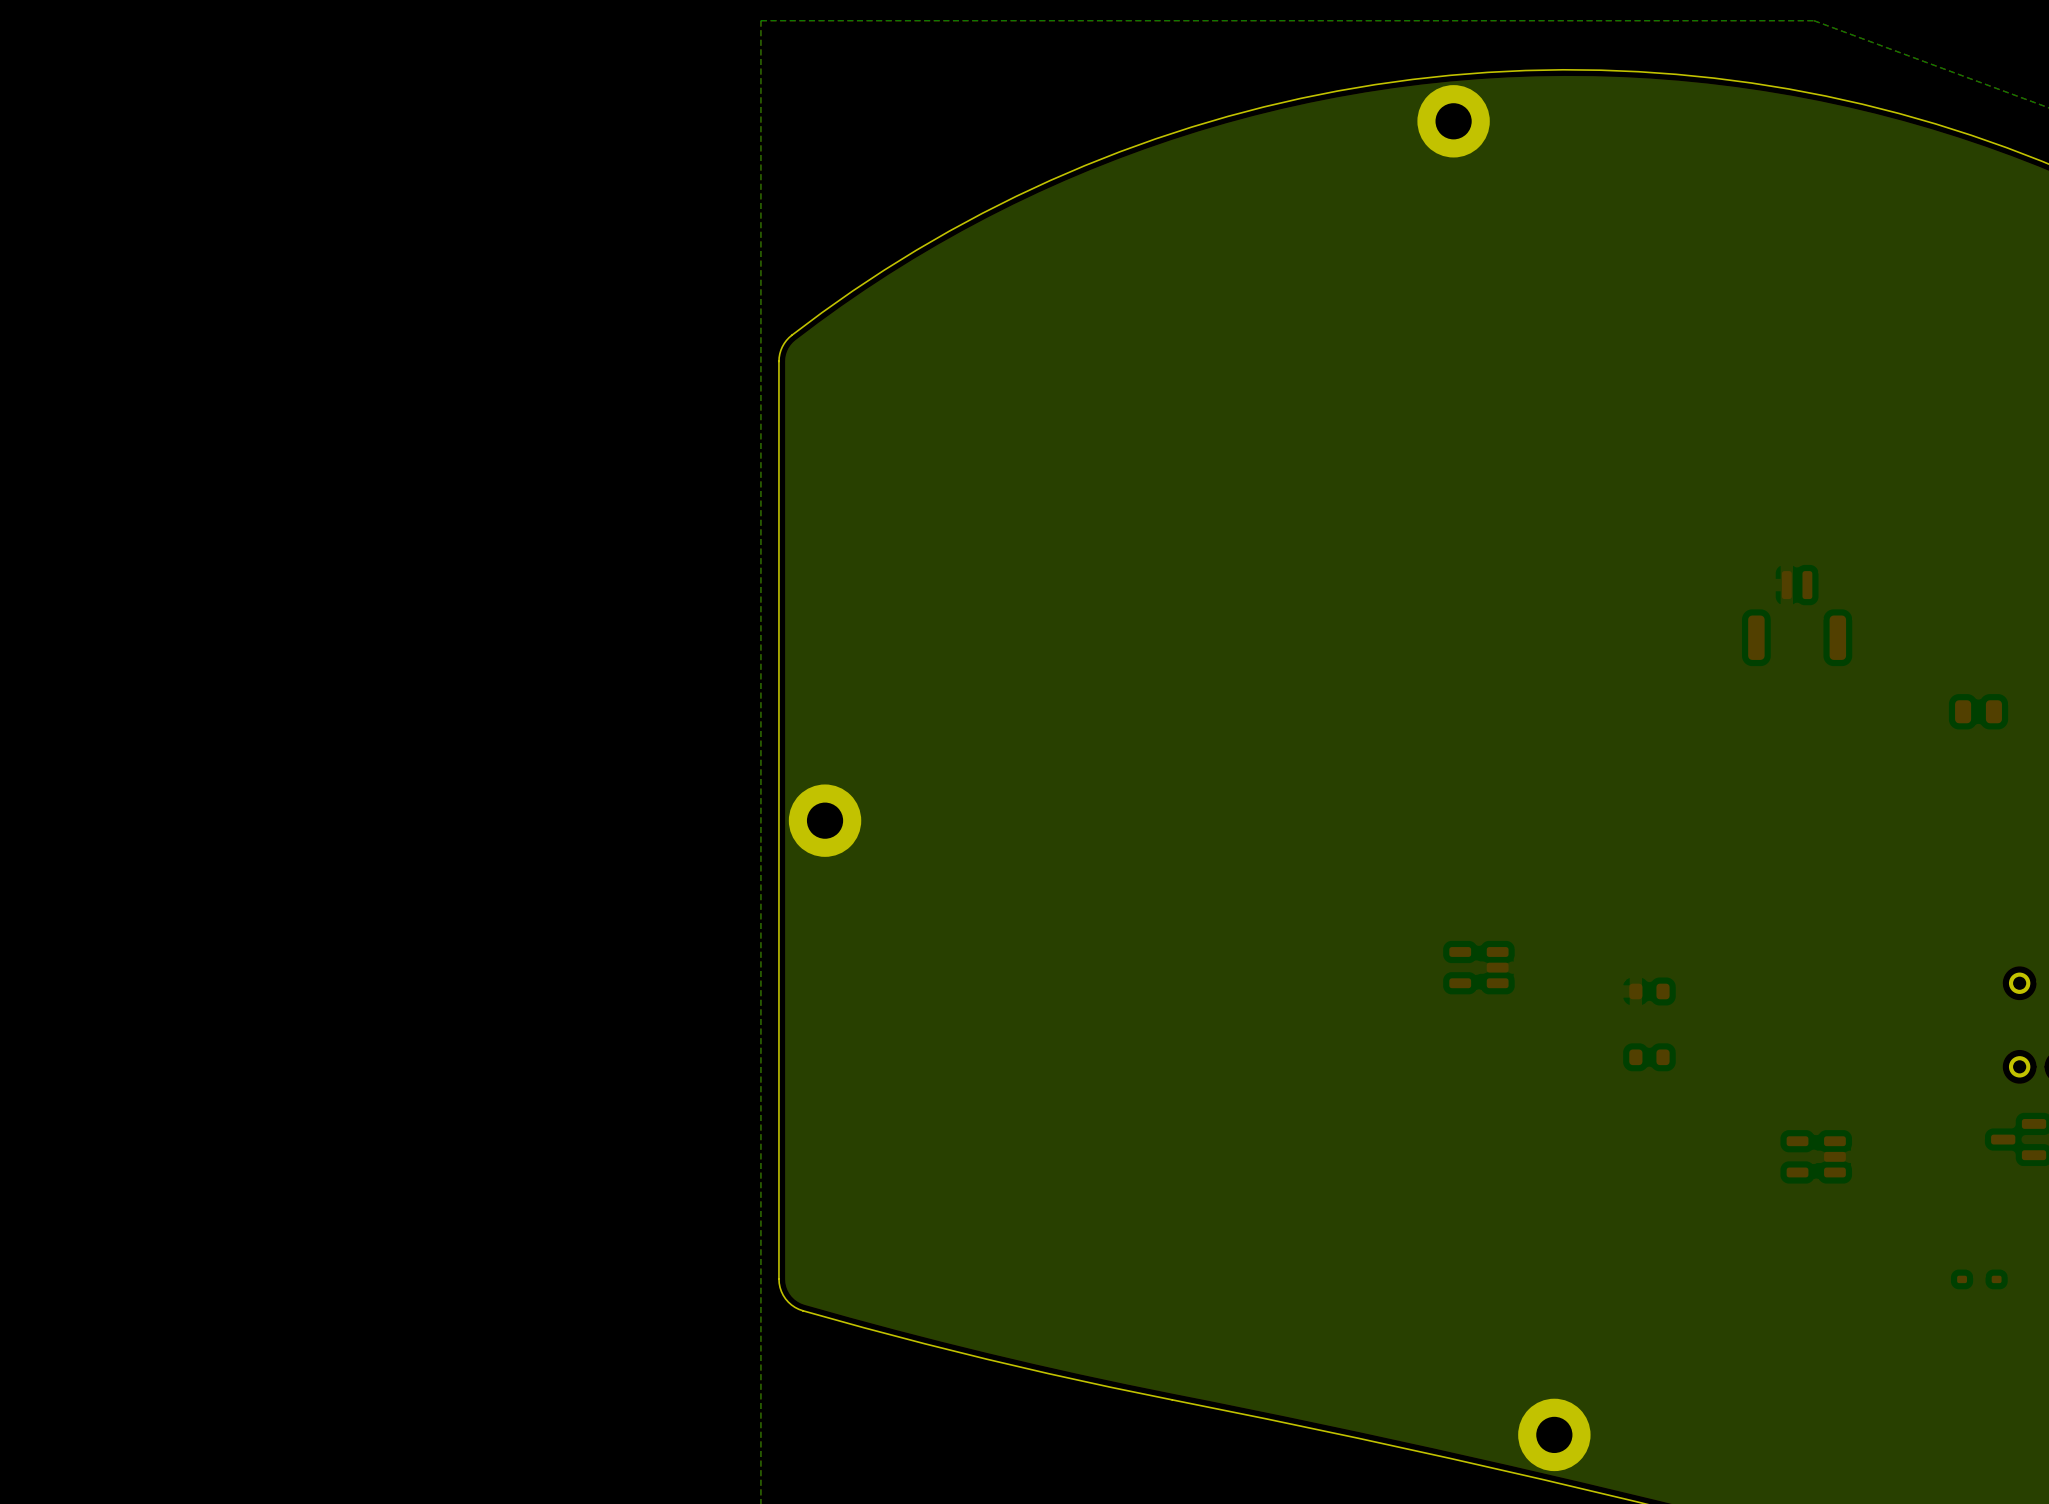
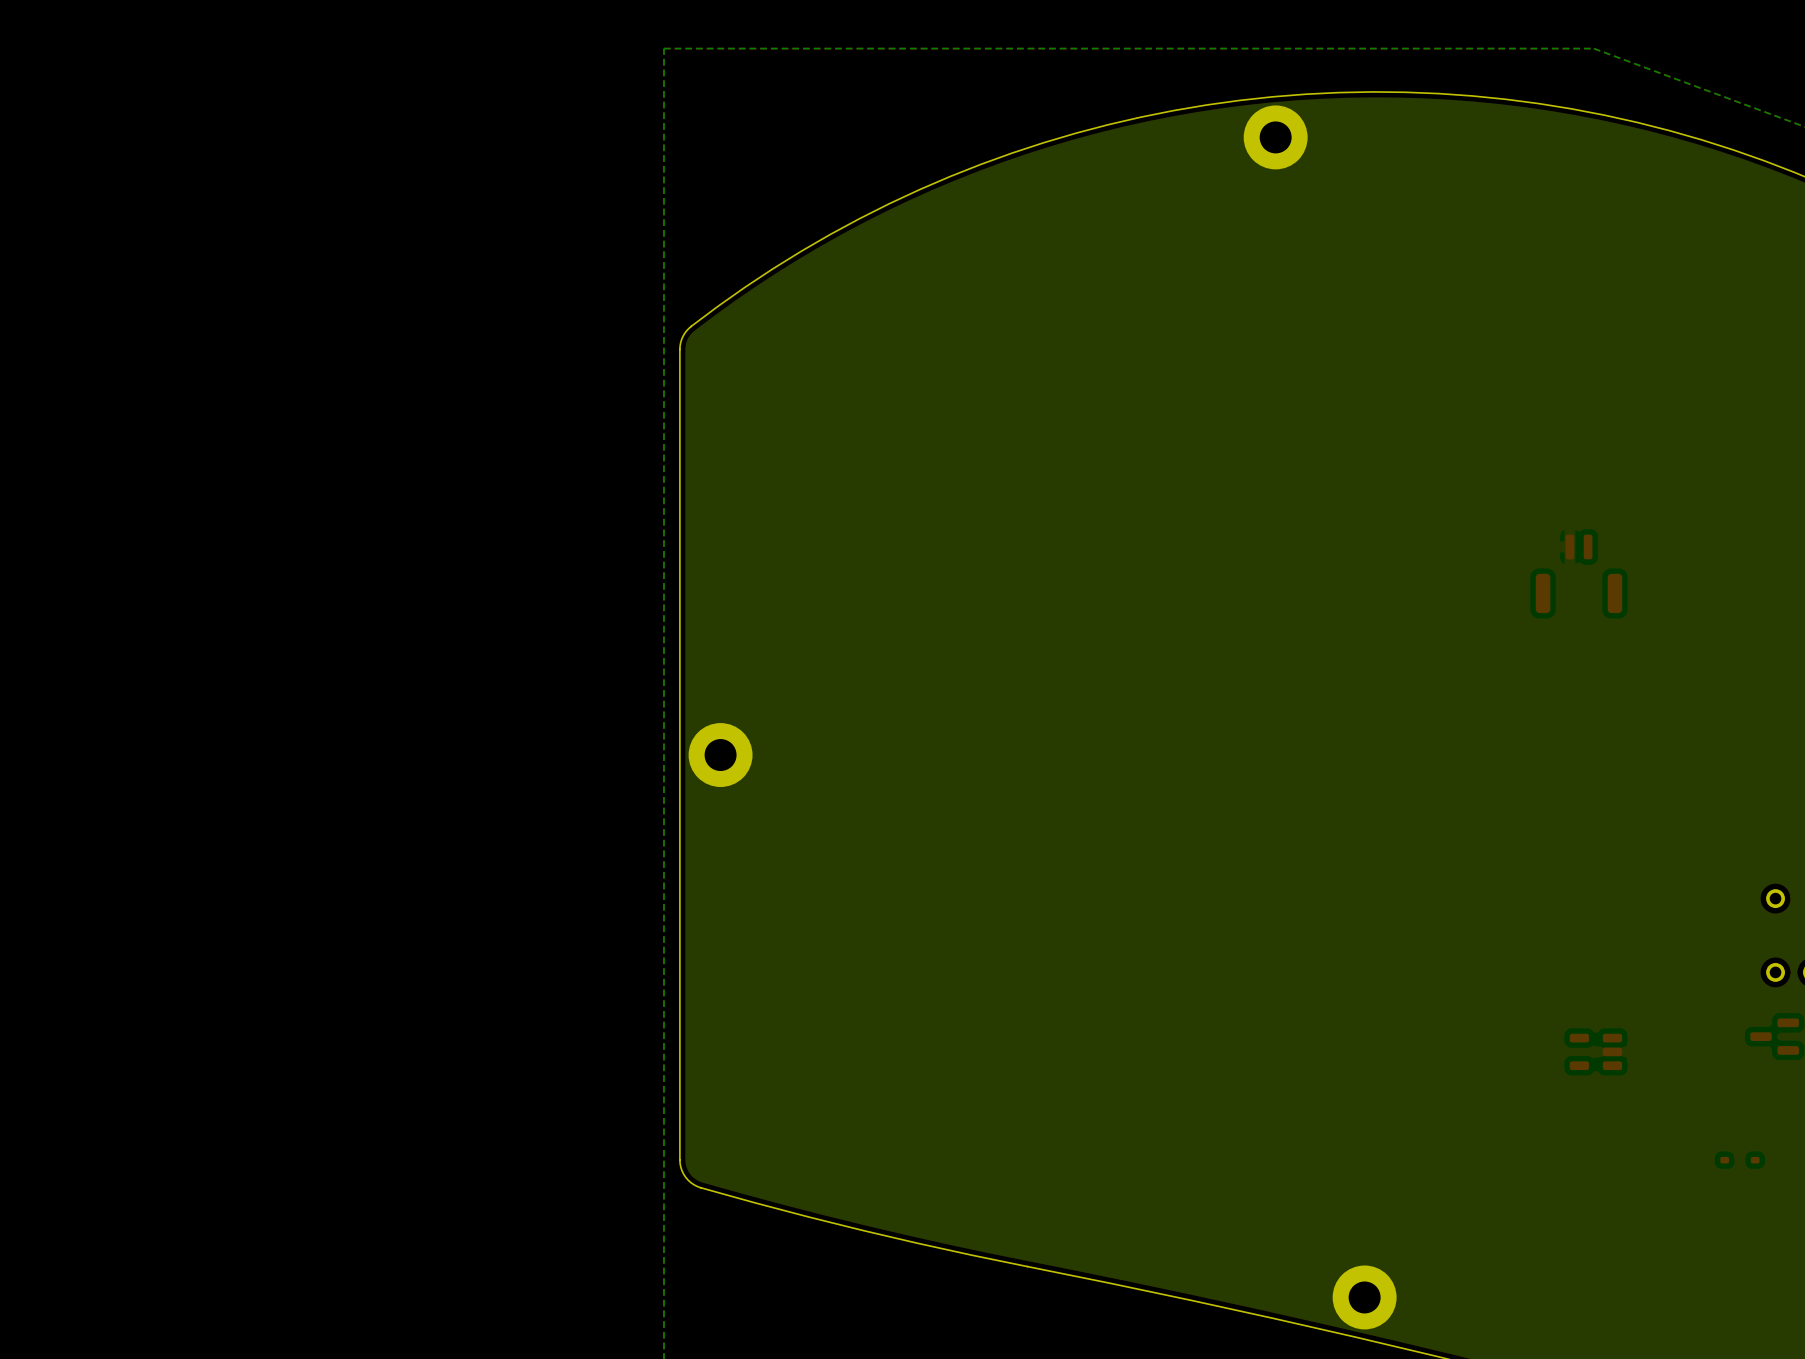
part: (1978, 711) -> none
part: (1478, 967) -> none
part: (1649, 991) -> none
part: (1649, 1057) -> none

